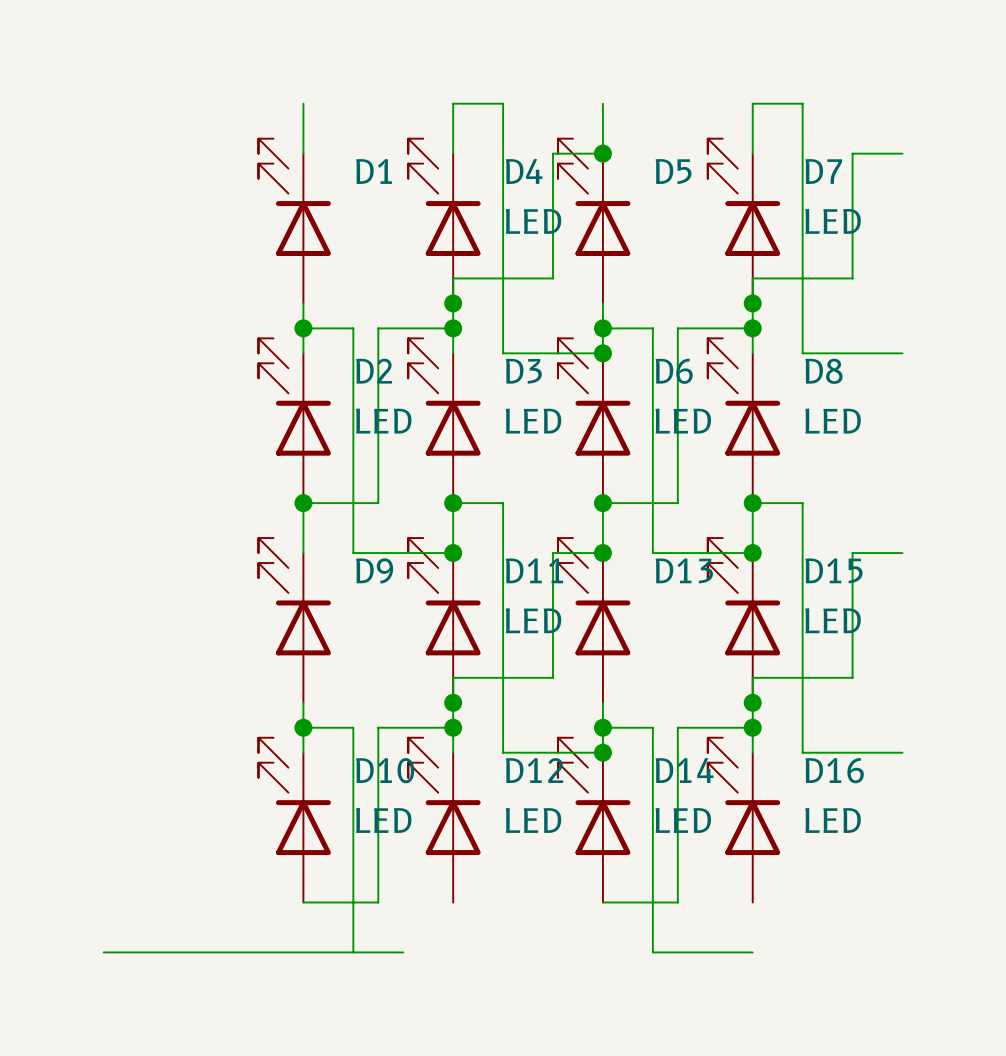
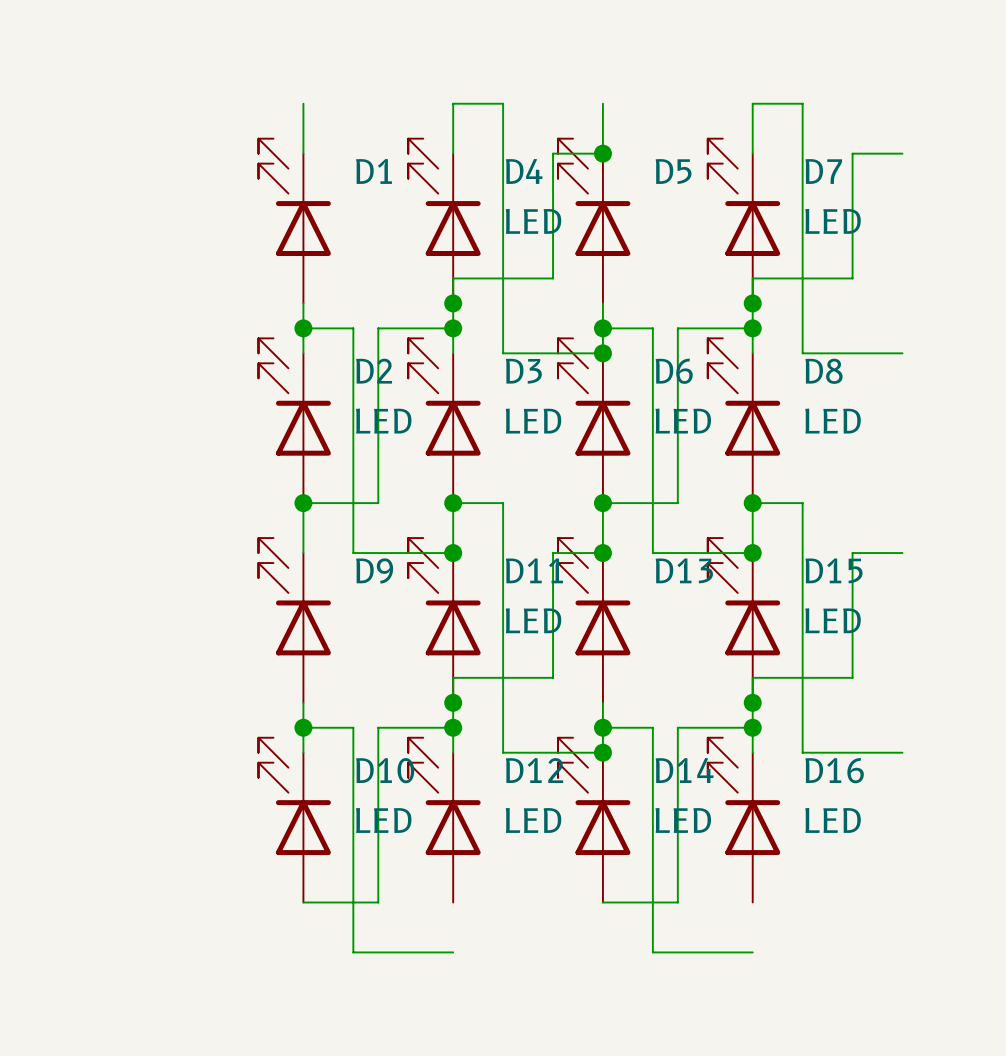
wire: (103, 952) (353, 952) -> none
wire: none -> (403, 952) (453, 952)

